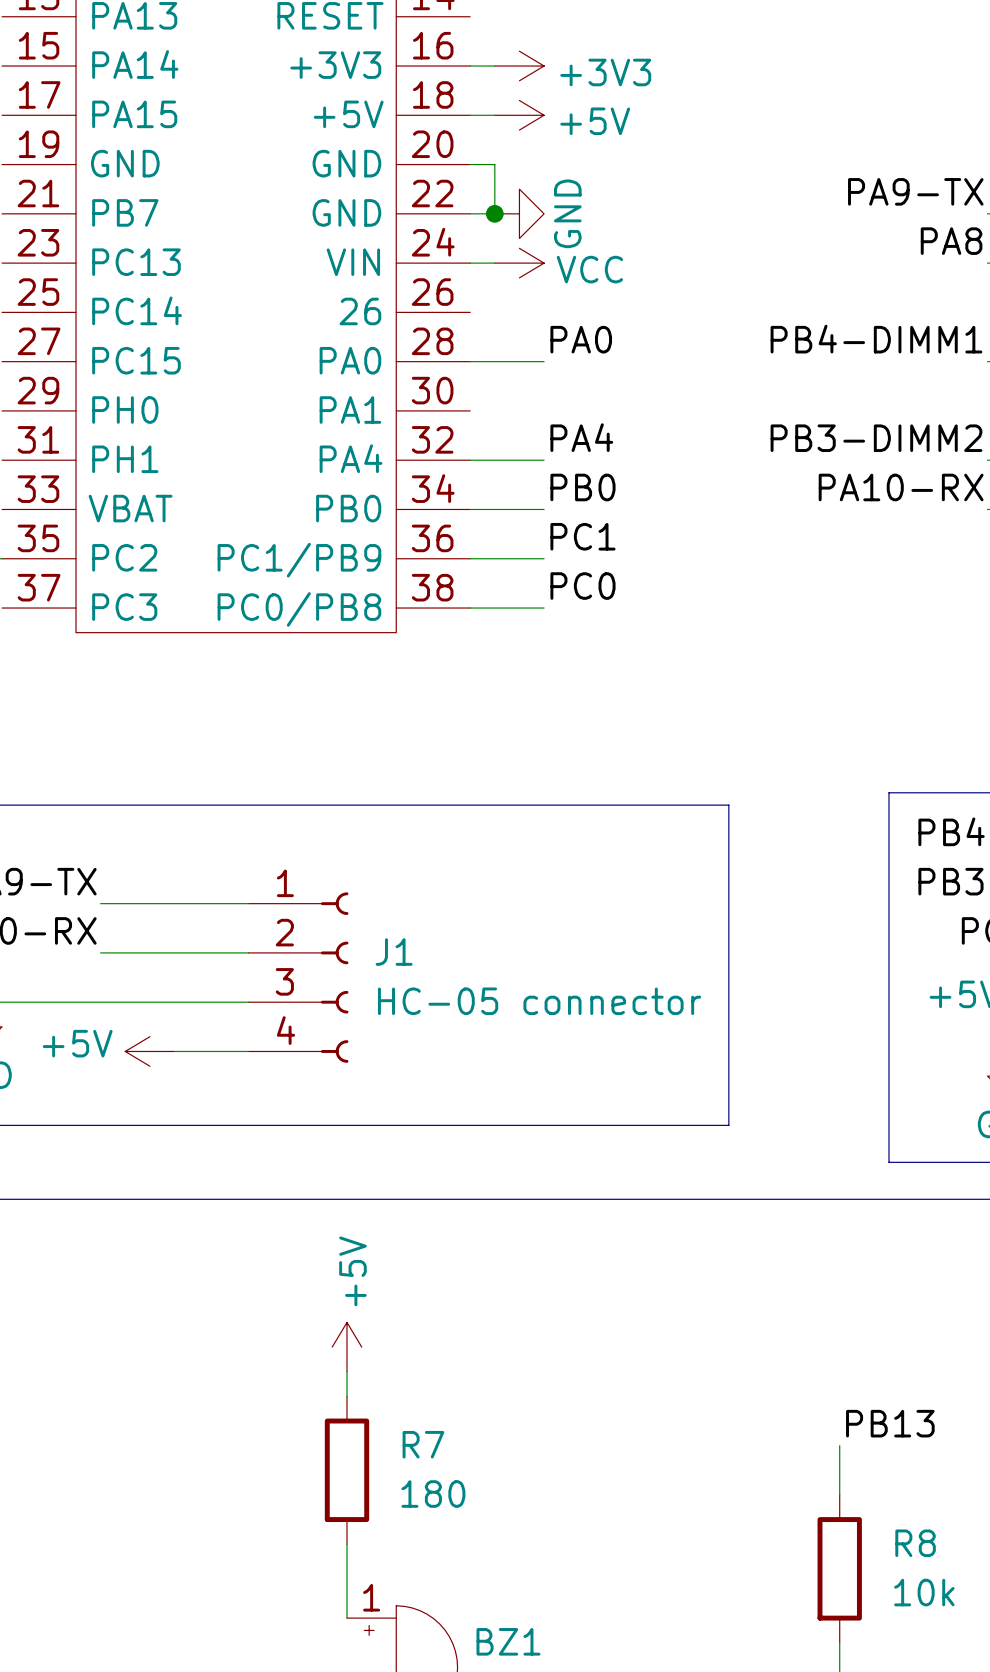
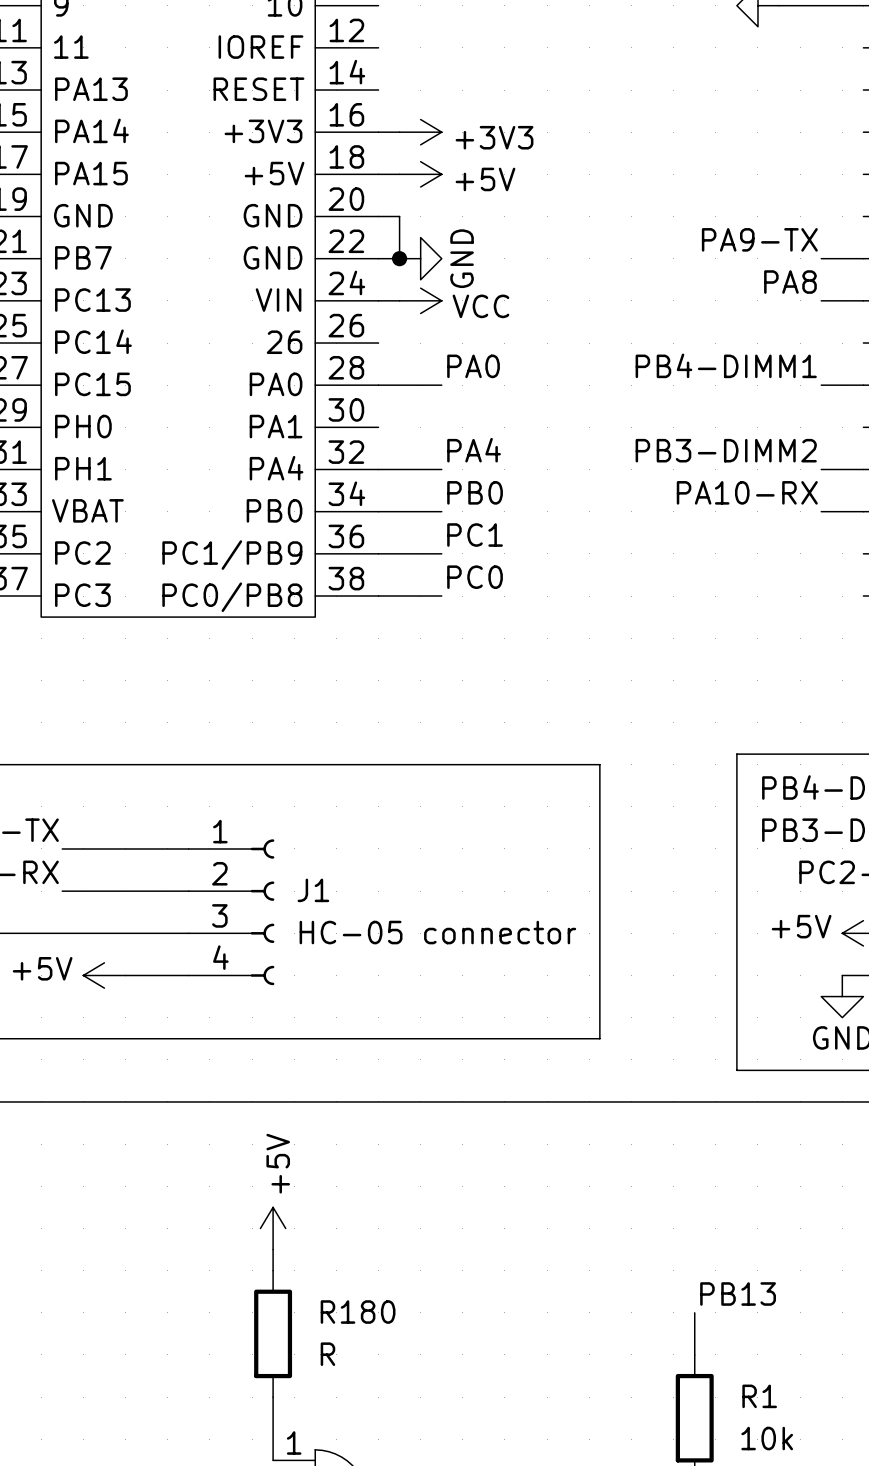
R7 name: R7 (423, 1444) -> R180 (358, 1312)
R7 value: 180 (433, 1494) -> R (327, 1354)
R8 name: R8 (915, 1543) -> R1 (759, 1396)

